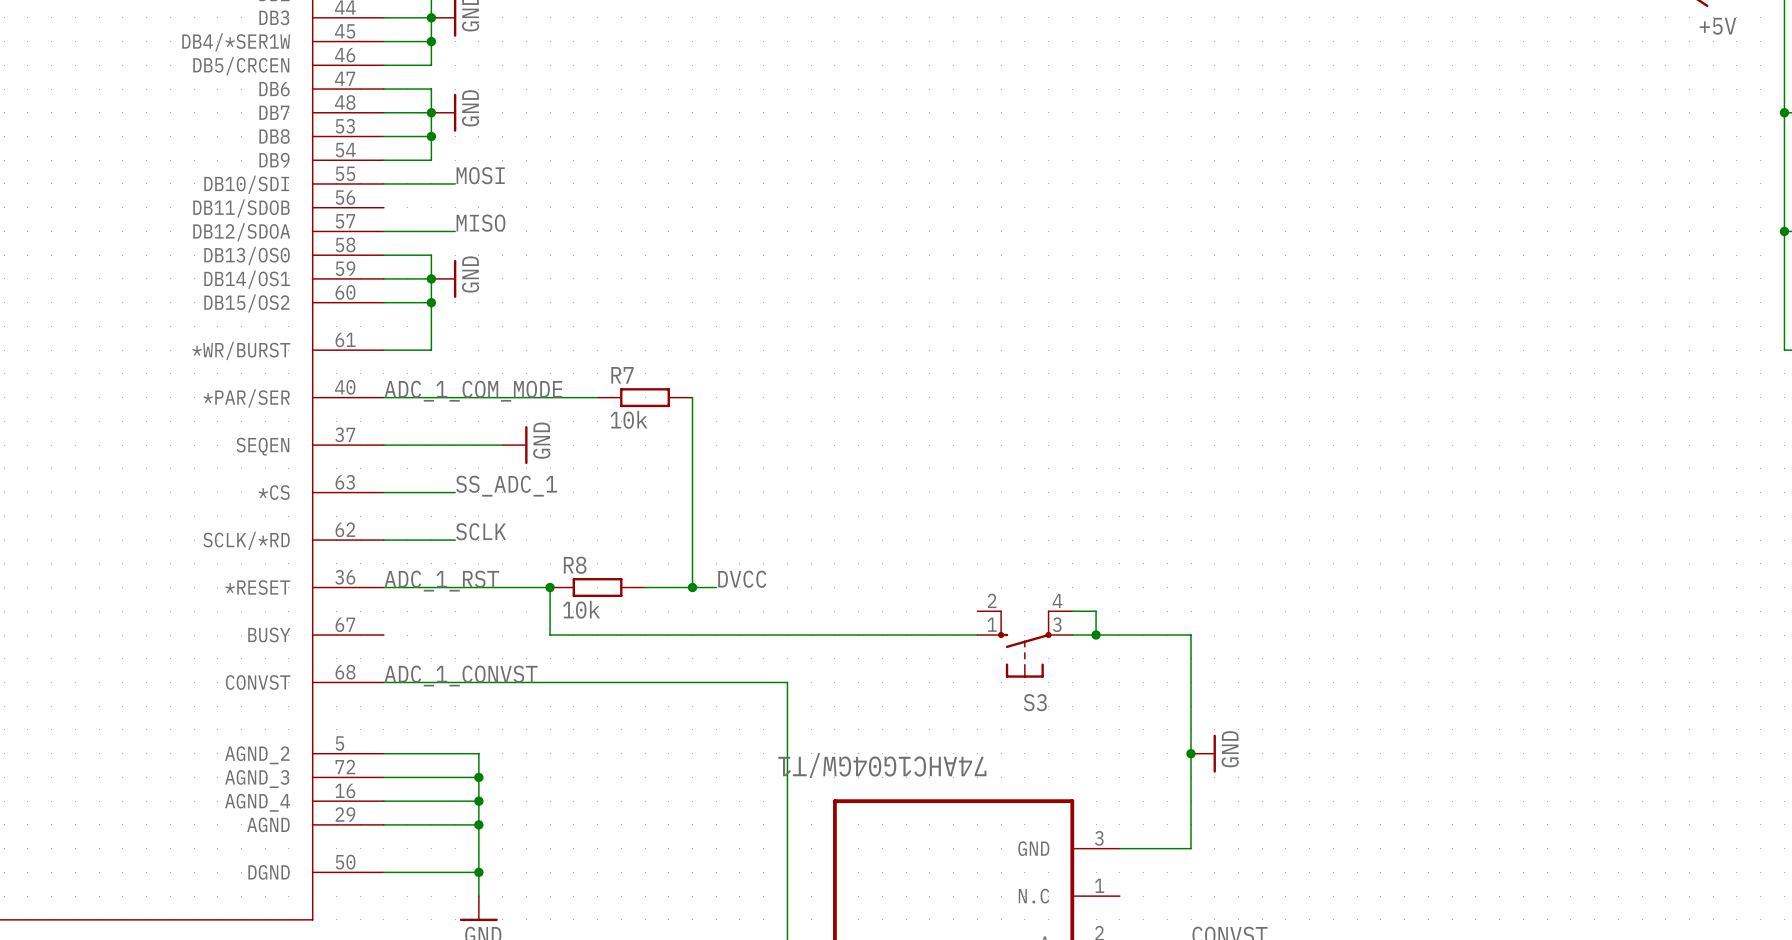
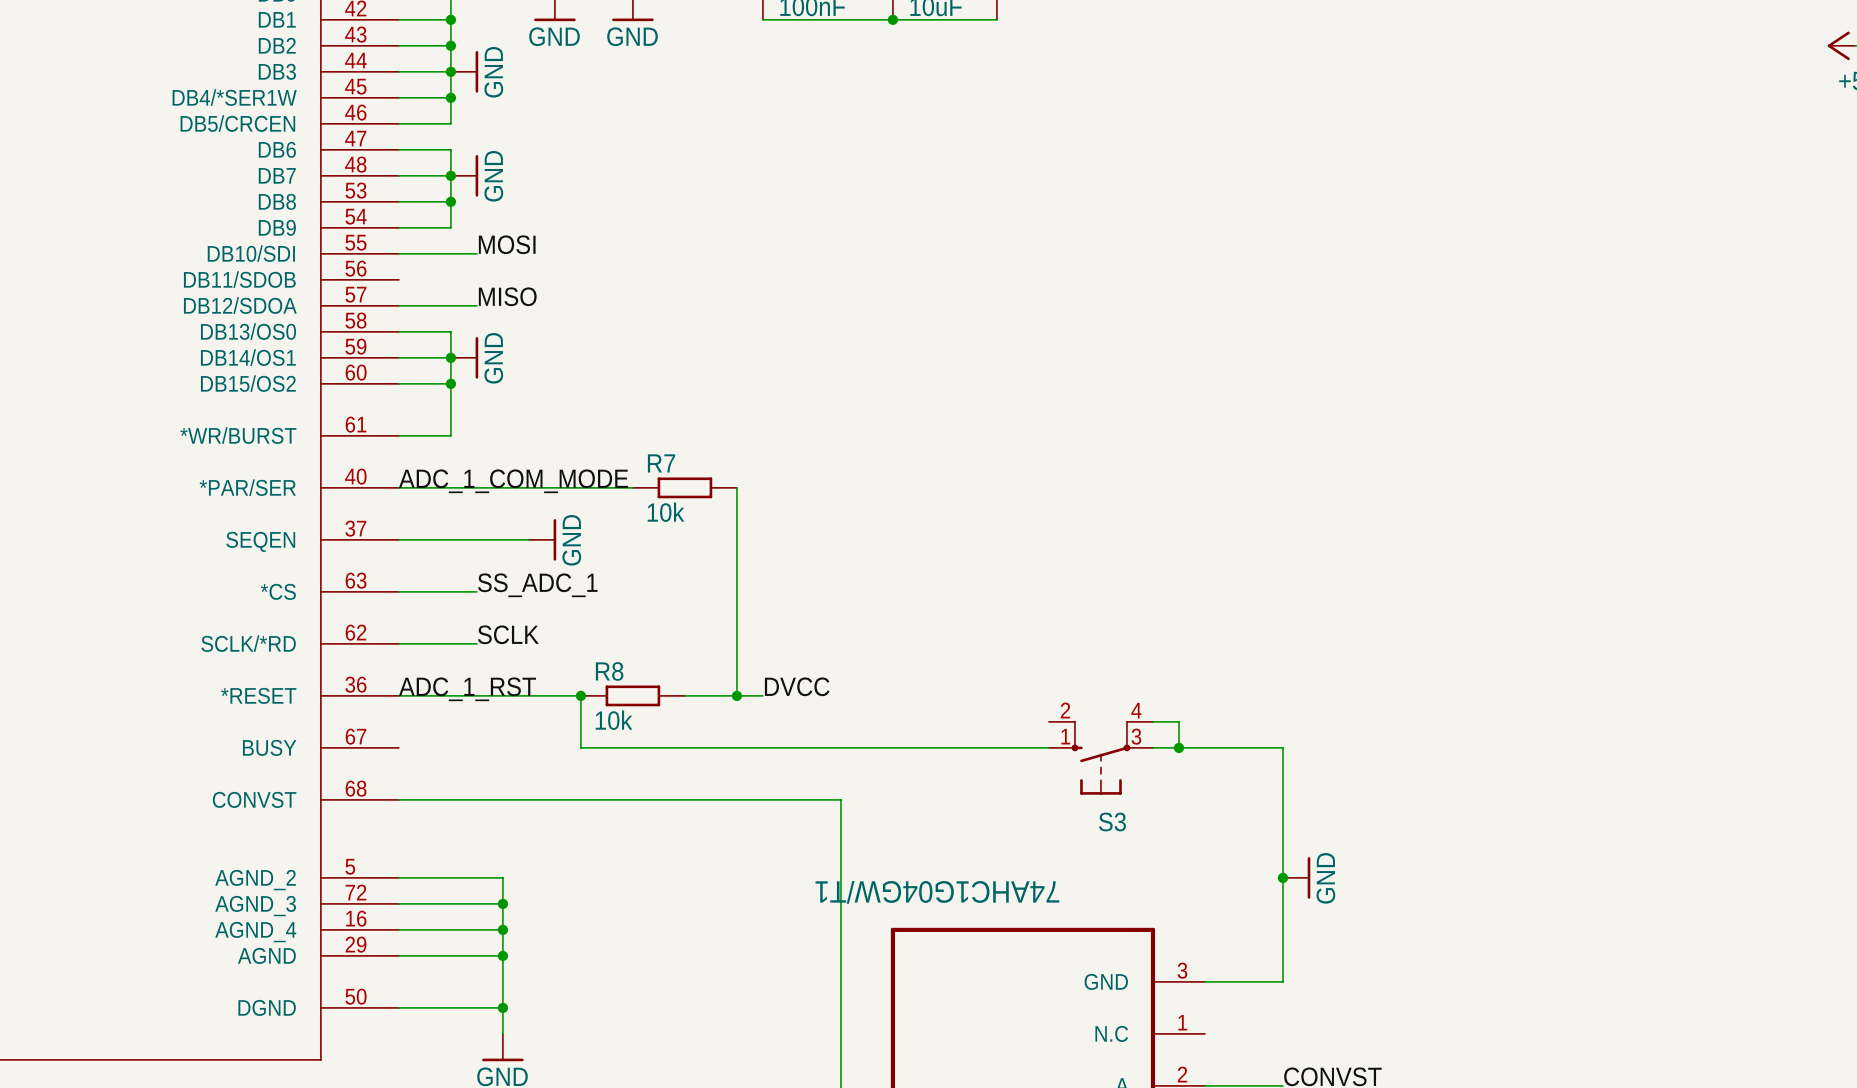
label: ADC_1_CONVST (461, 676) -> none

